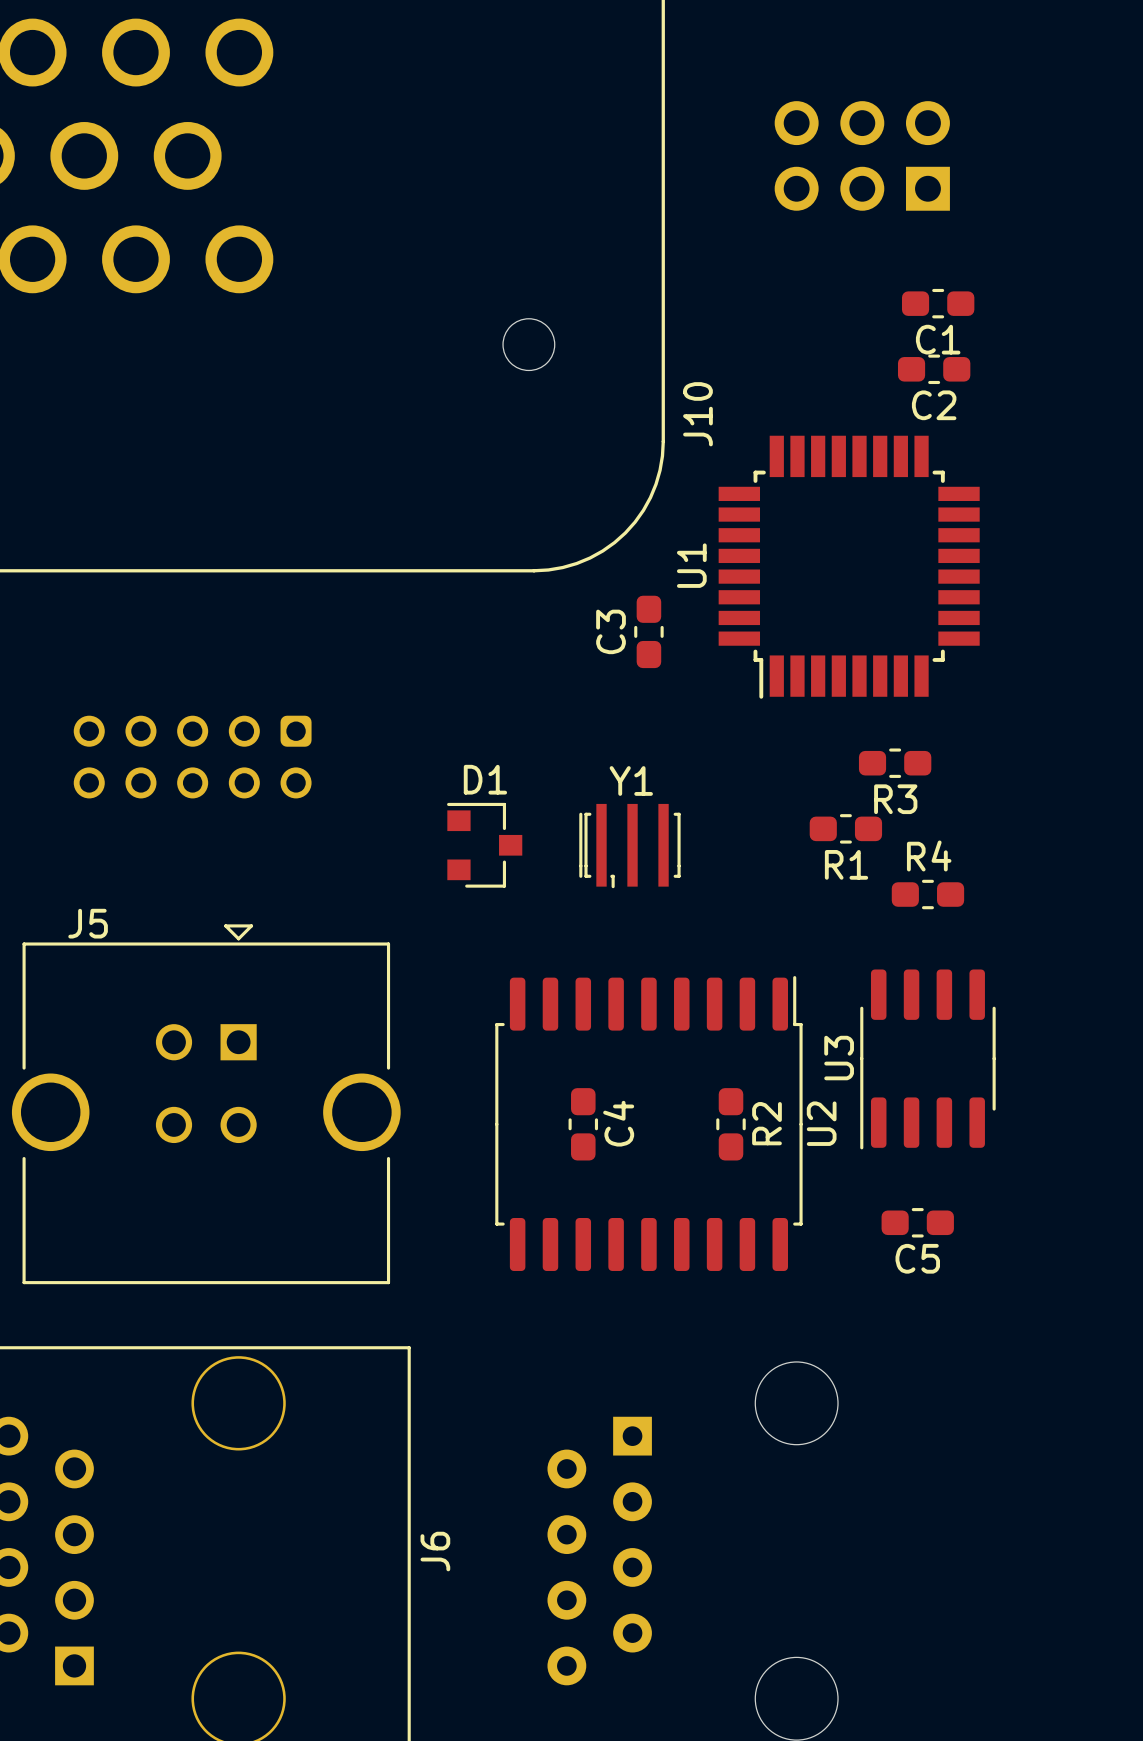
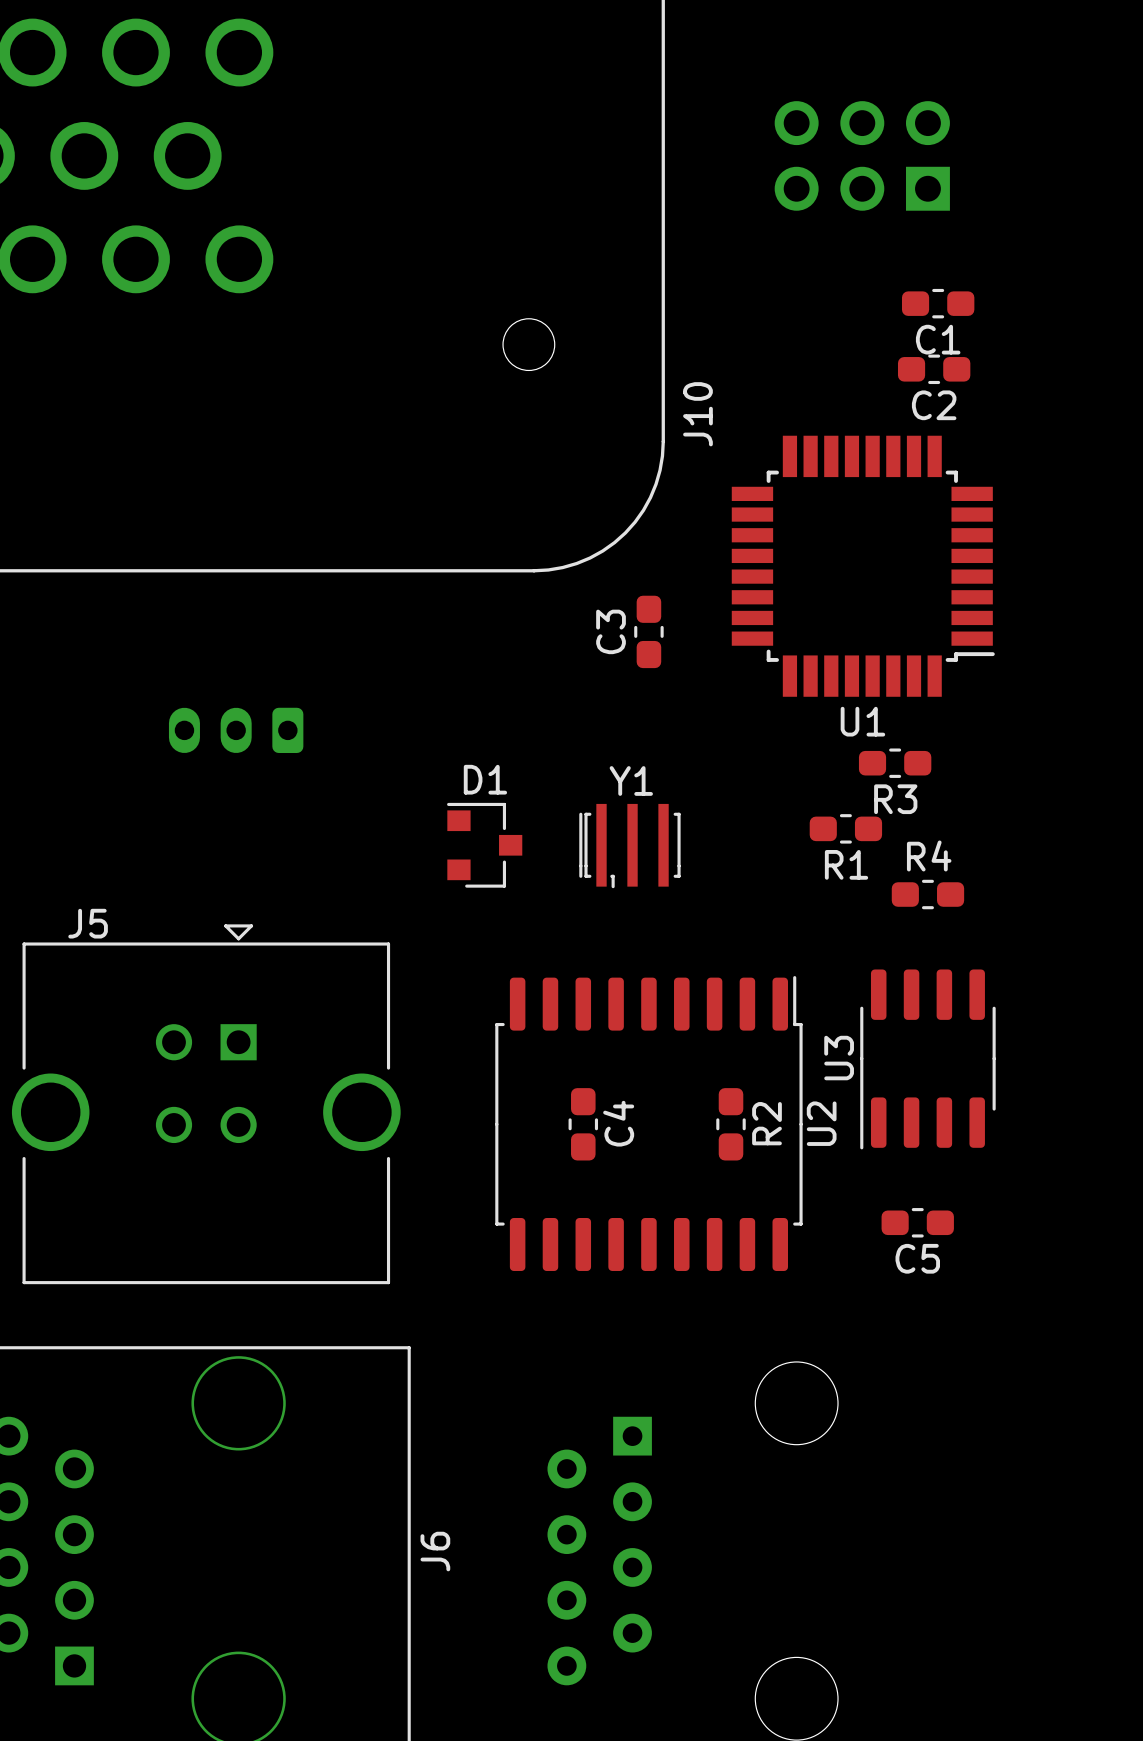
U1 rotation: 0° (849, 567) -> 90° counterclockwise (863, 566)
part: none -> (236, 730)
part: (192, 757) -> none

